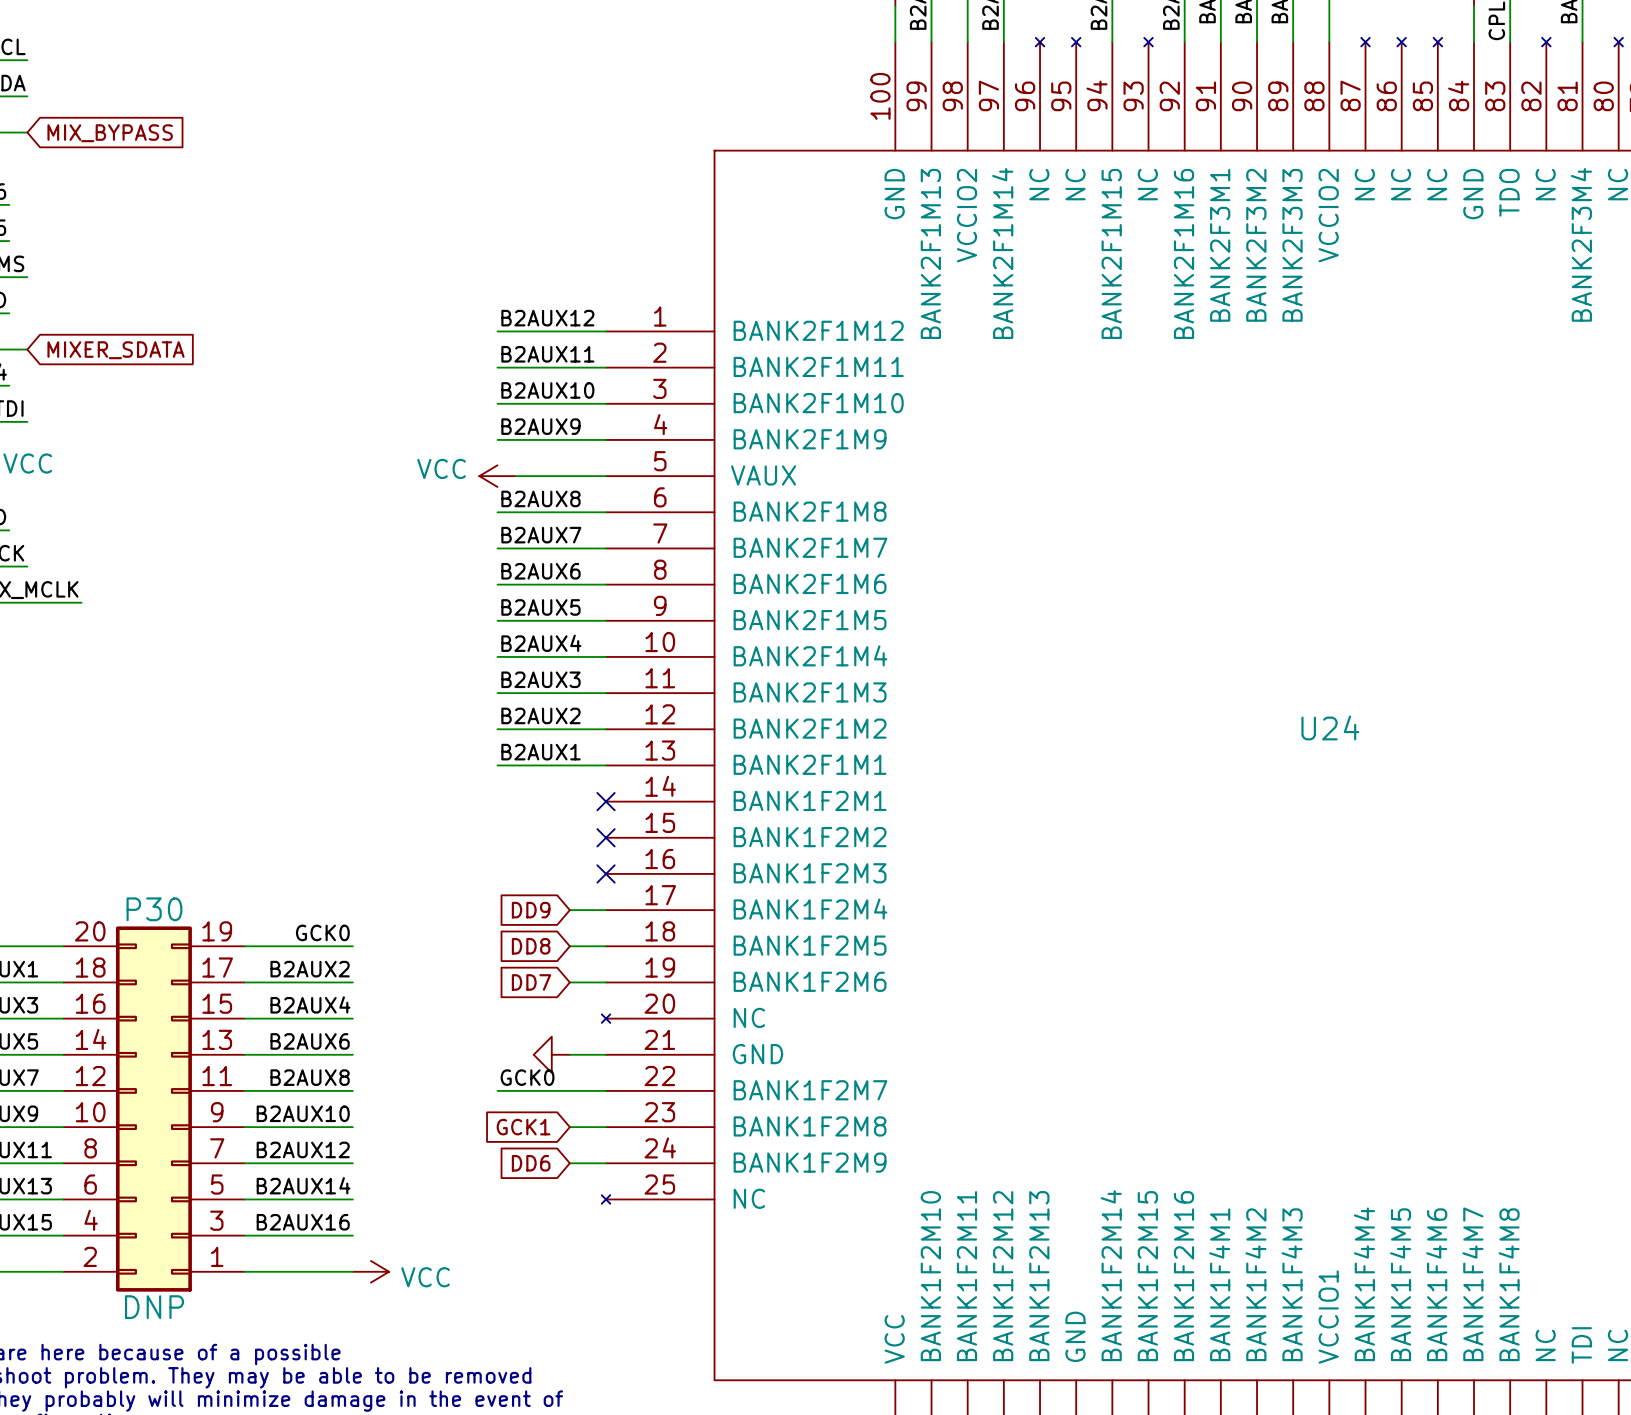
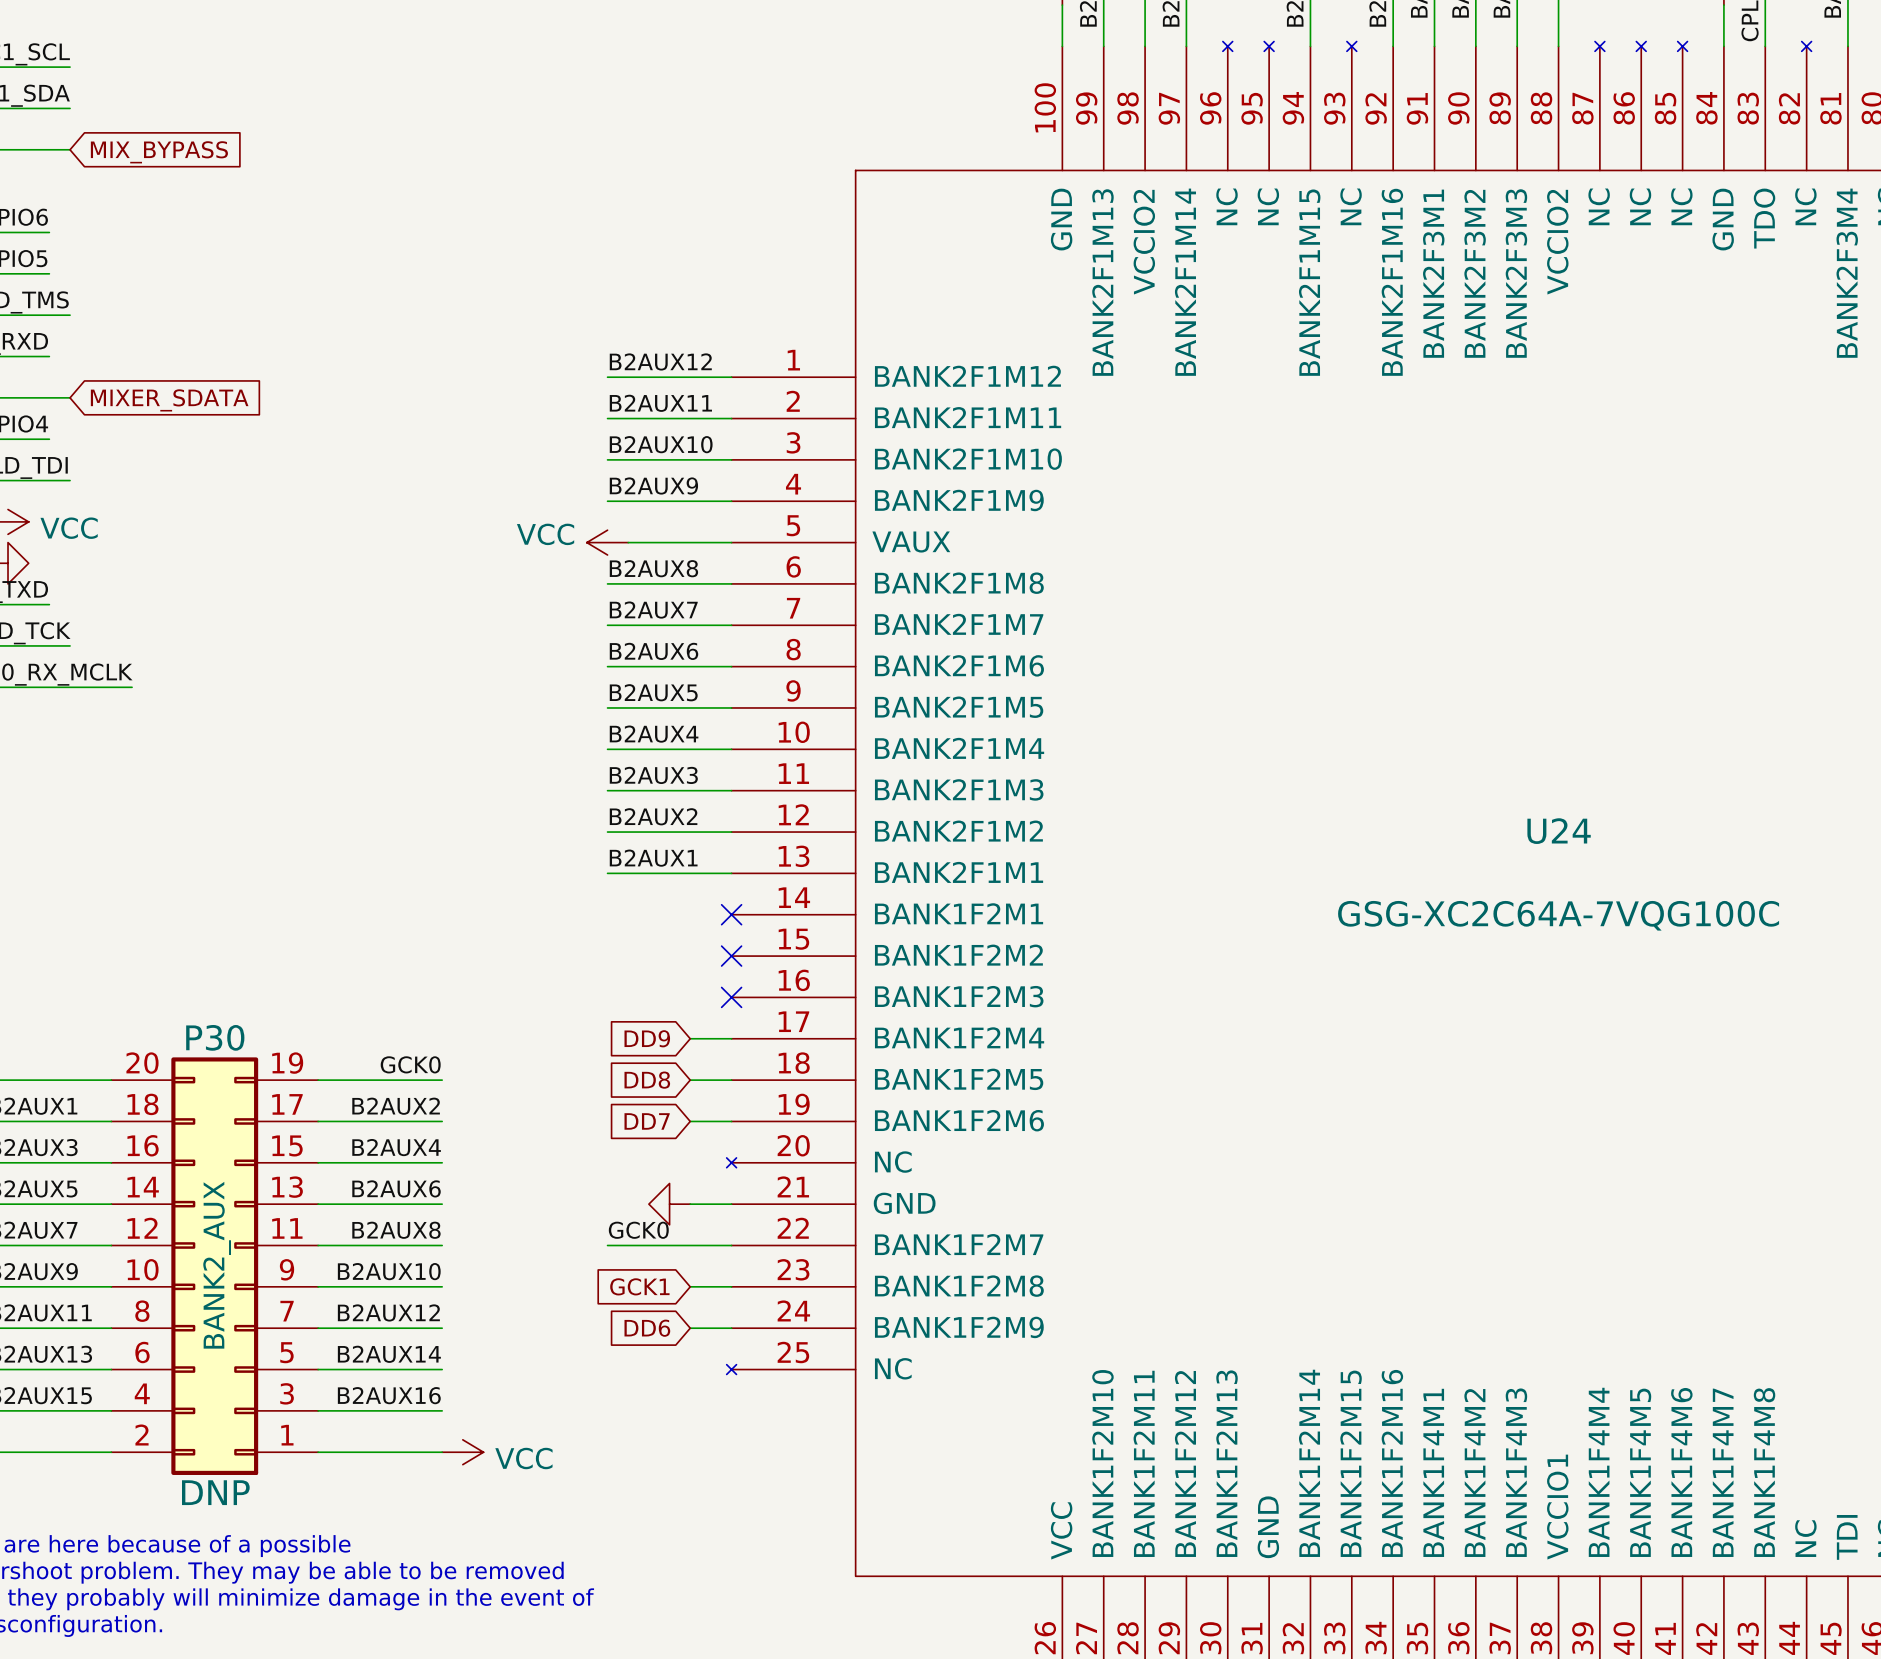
U24 value: none -> GSG-XC2C64A-7VQG100C (1558, 915)
P30 value: none -> BANK2_AUX (217, 1265)

